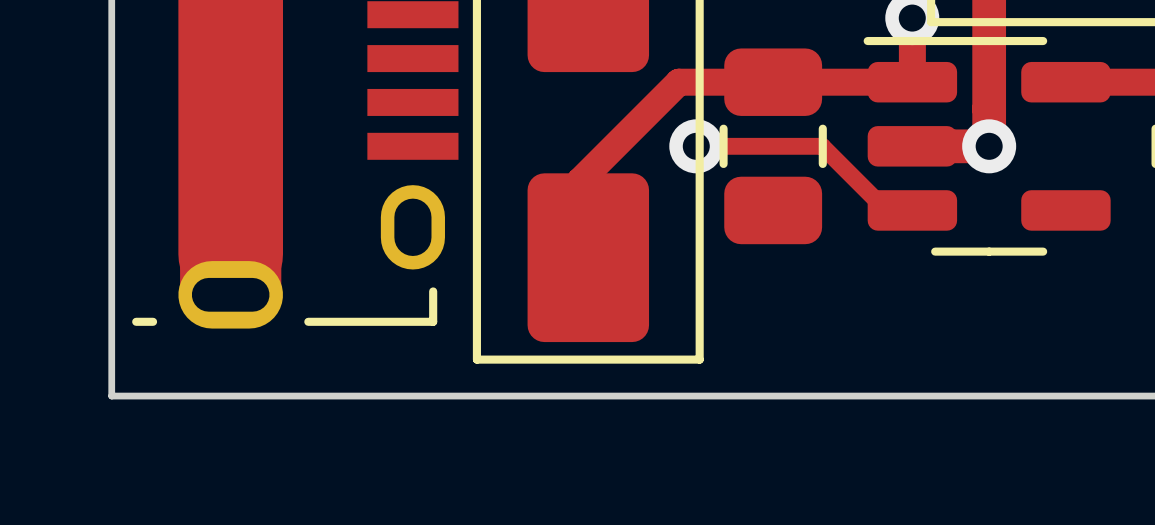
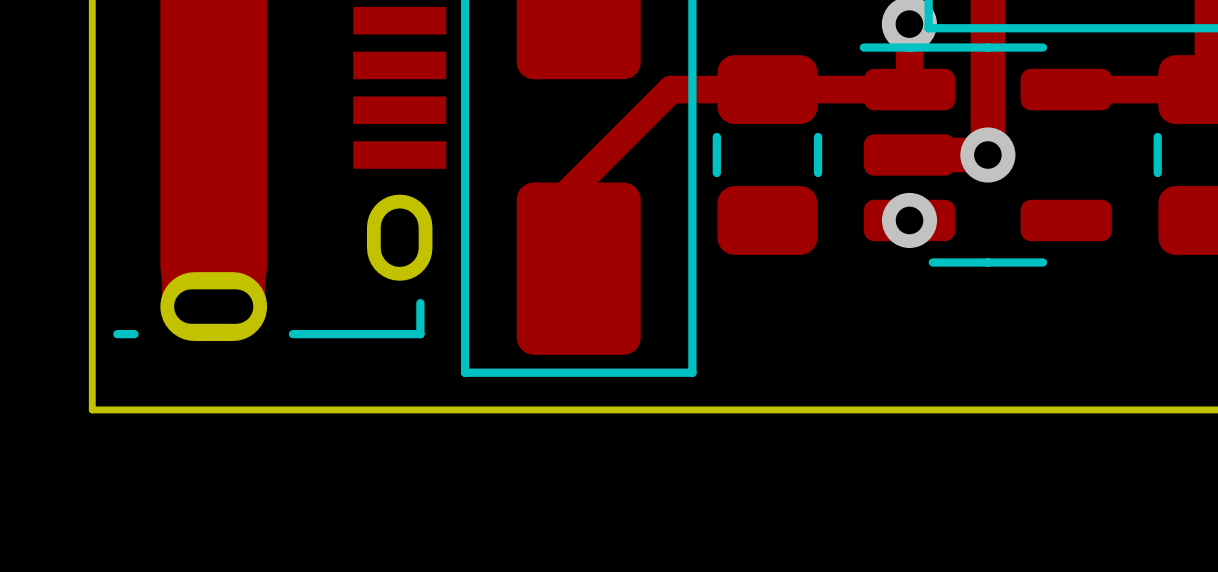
track: (696, 146) (822, 146) (886, 210) (912, 210) -> none
via position: (696, 146) -> (909, 220)

